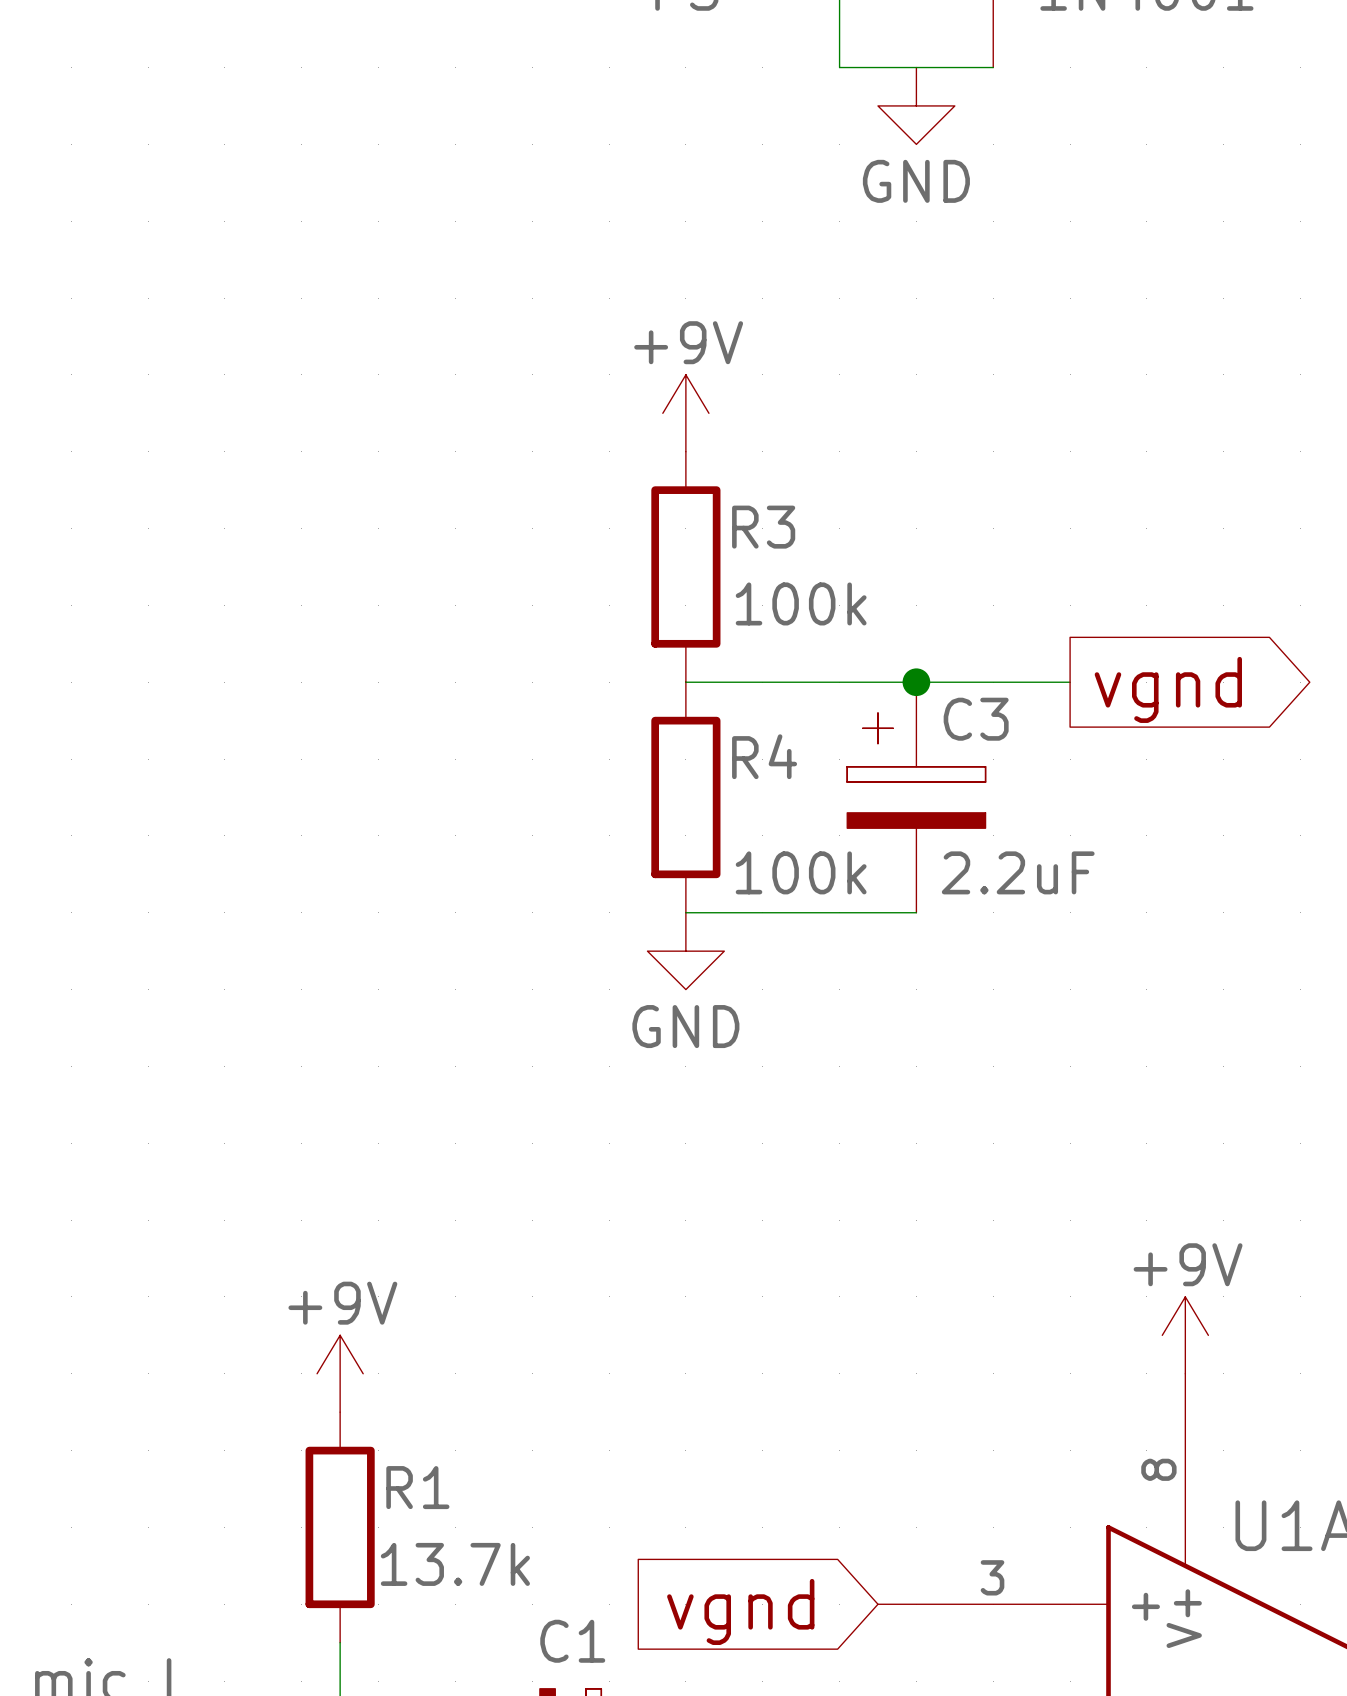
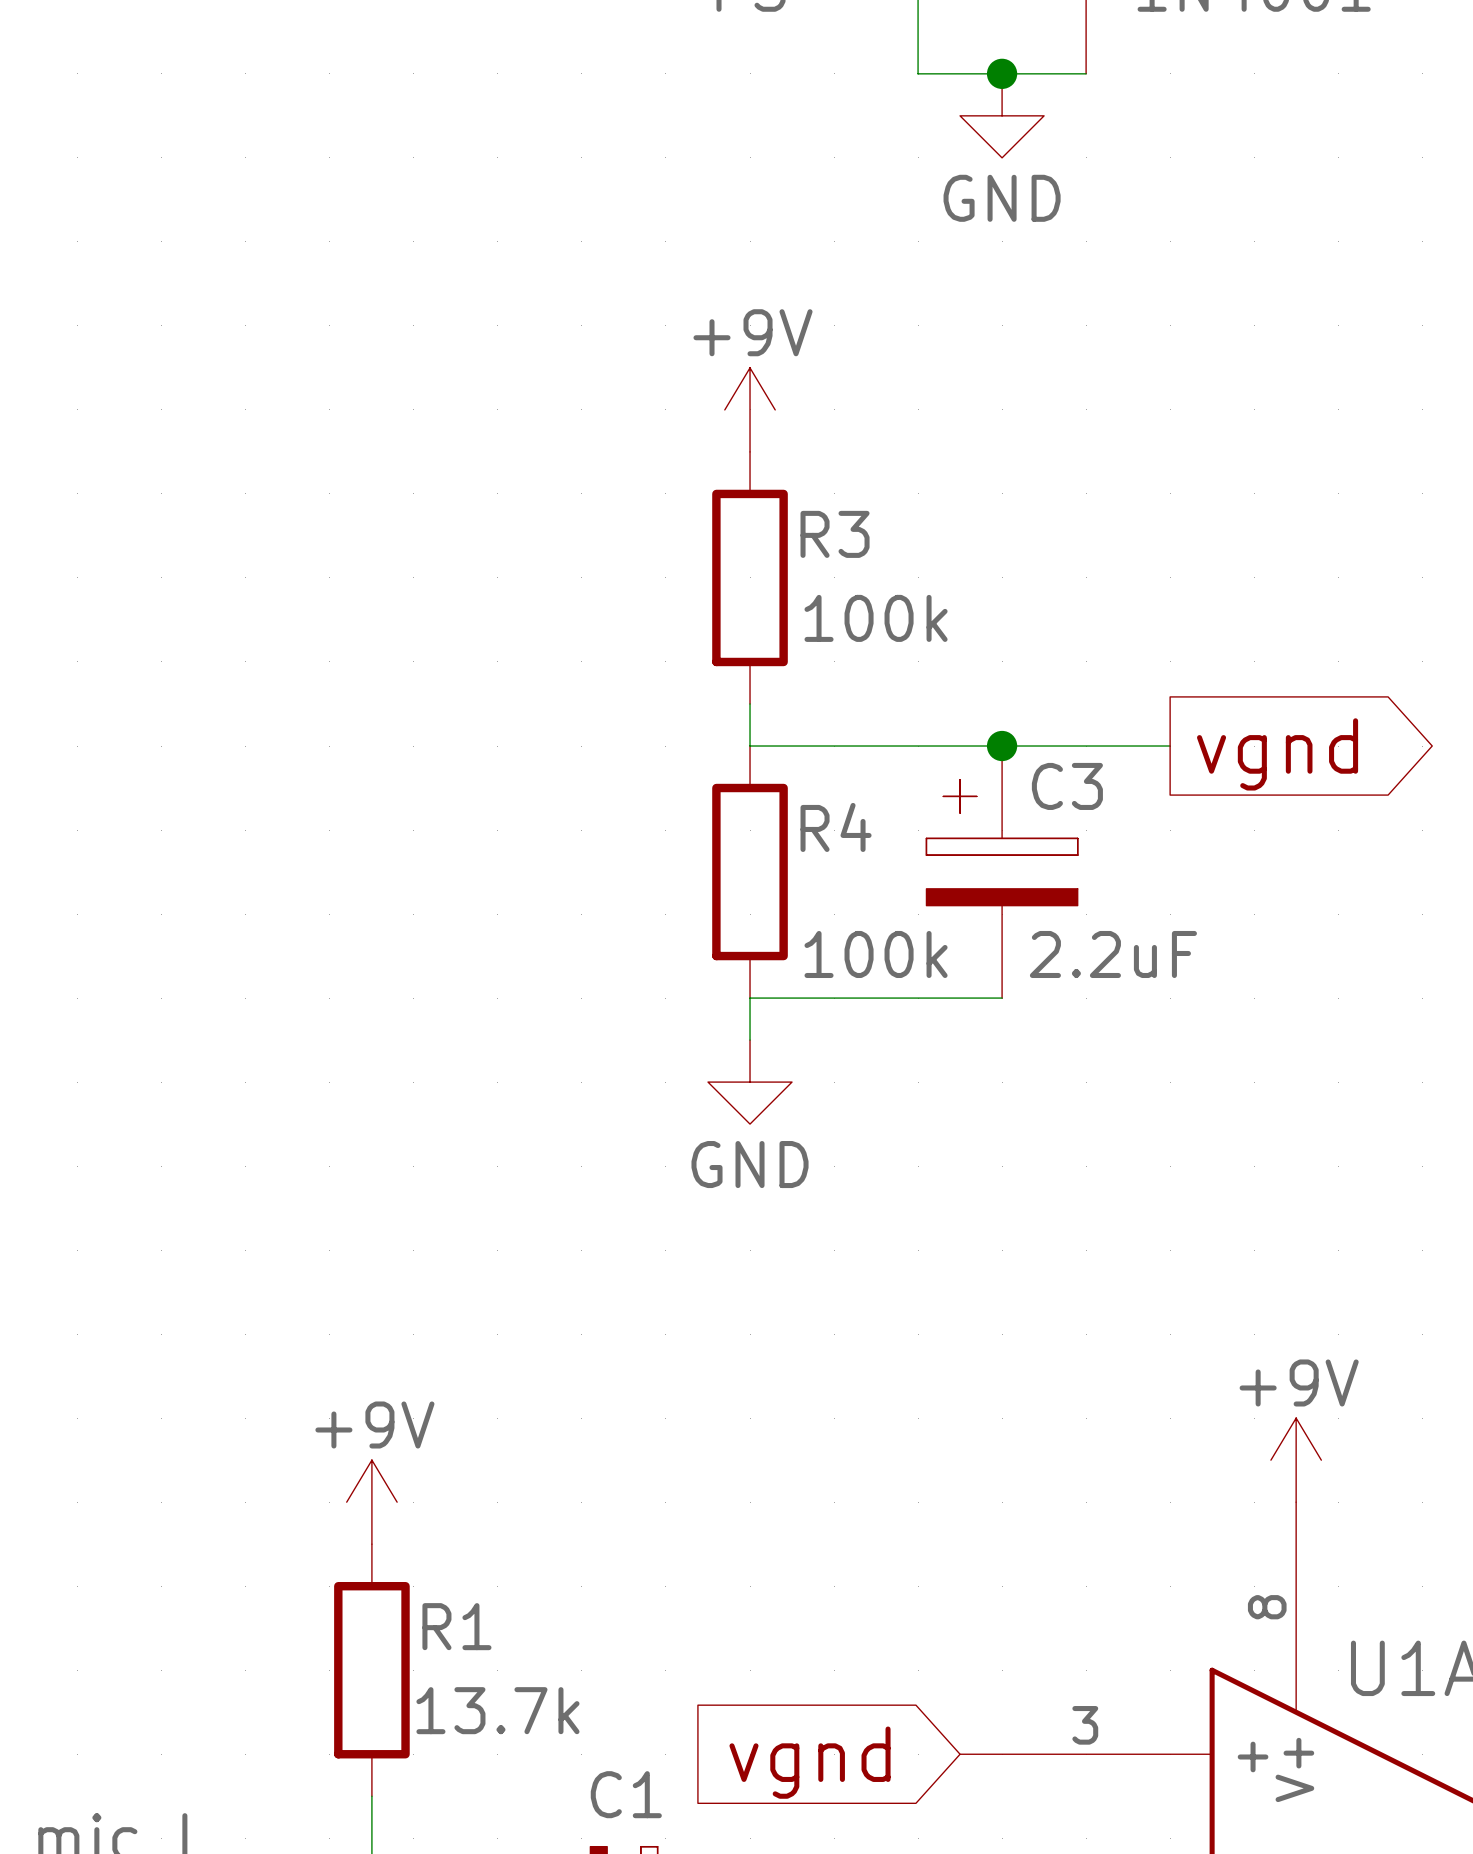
junction: none -> (1002, 73)
power symbol position: +9V (685, 413) -> +9V (750, 409)
R3 position: (685, 566) -> (750, 577)
power symbol position: GND (685, 951) -> GND (750, 1082)

